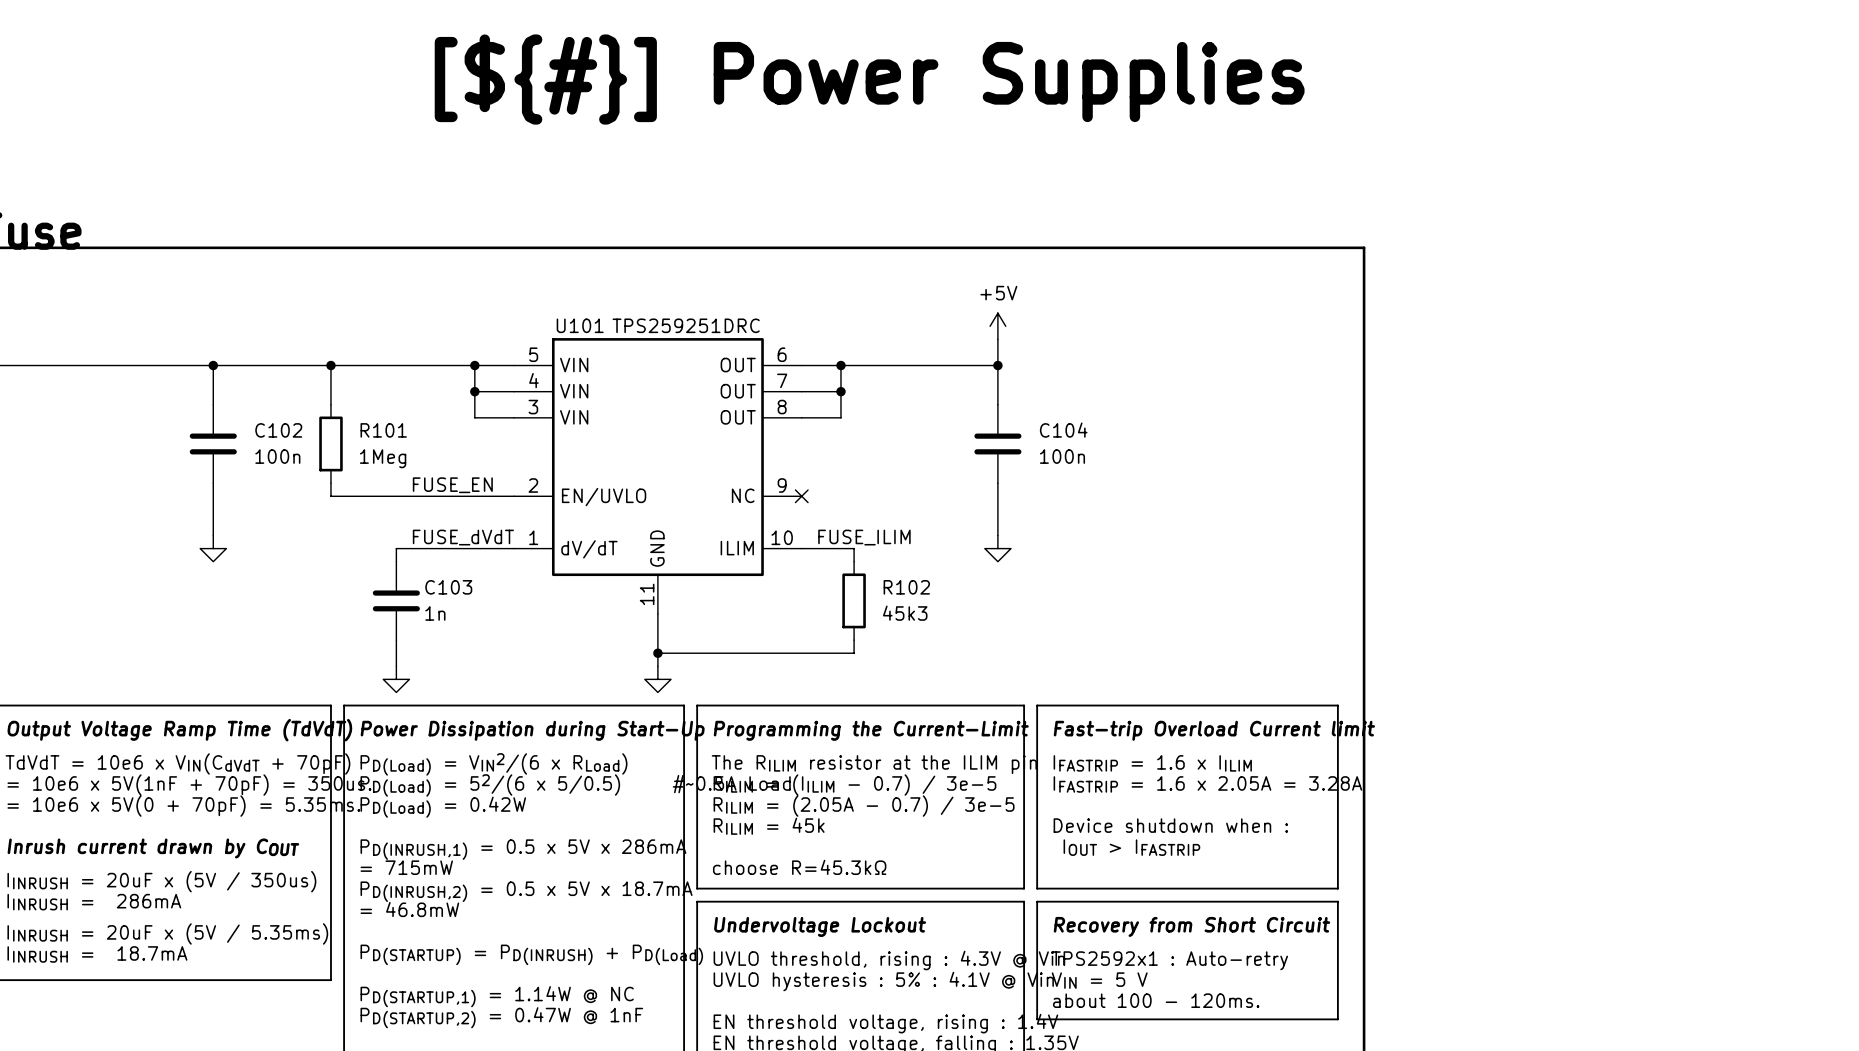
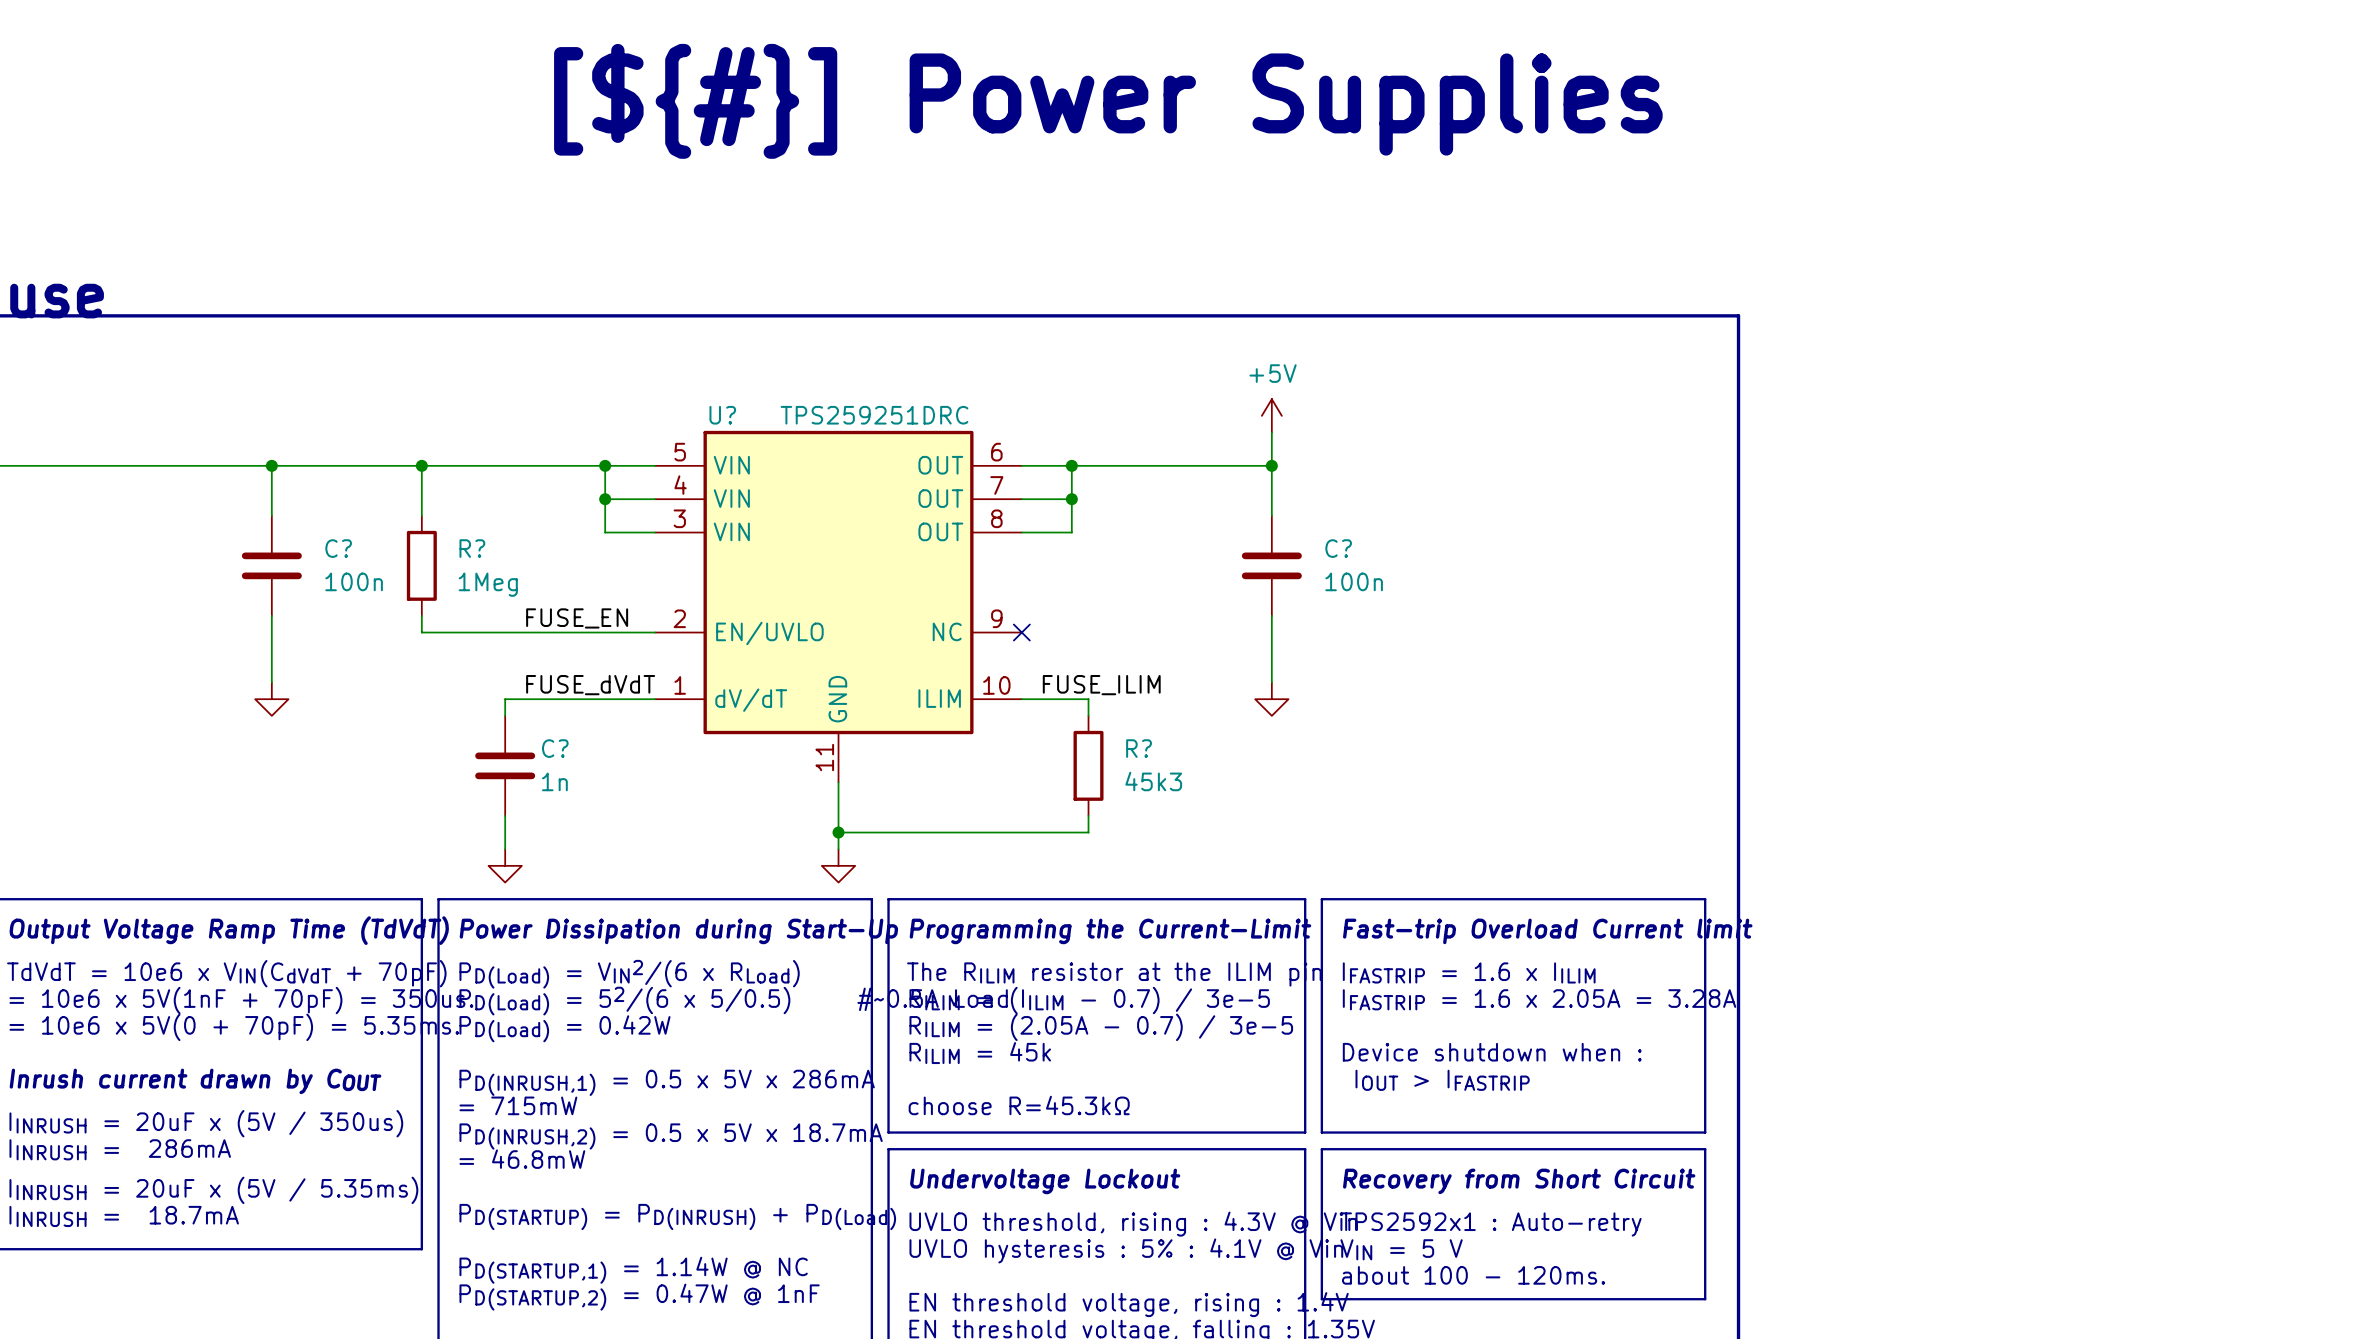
U101 name: U101 (580, 325) -> U? (722, 415)
C102 name: C102 (278, 430) -> C? (338, 548)
R101 name: R101 (383, 430) -> R? (472, 548)
C104 name: C104 (1063, 430) -> C? (1338, 548)
C103 name: C103 (448, 587) -> C? (555, 748)
R102 name: R102 (906, 587) -> R? (1139, 748)

